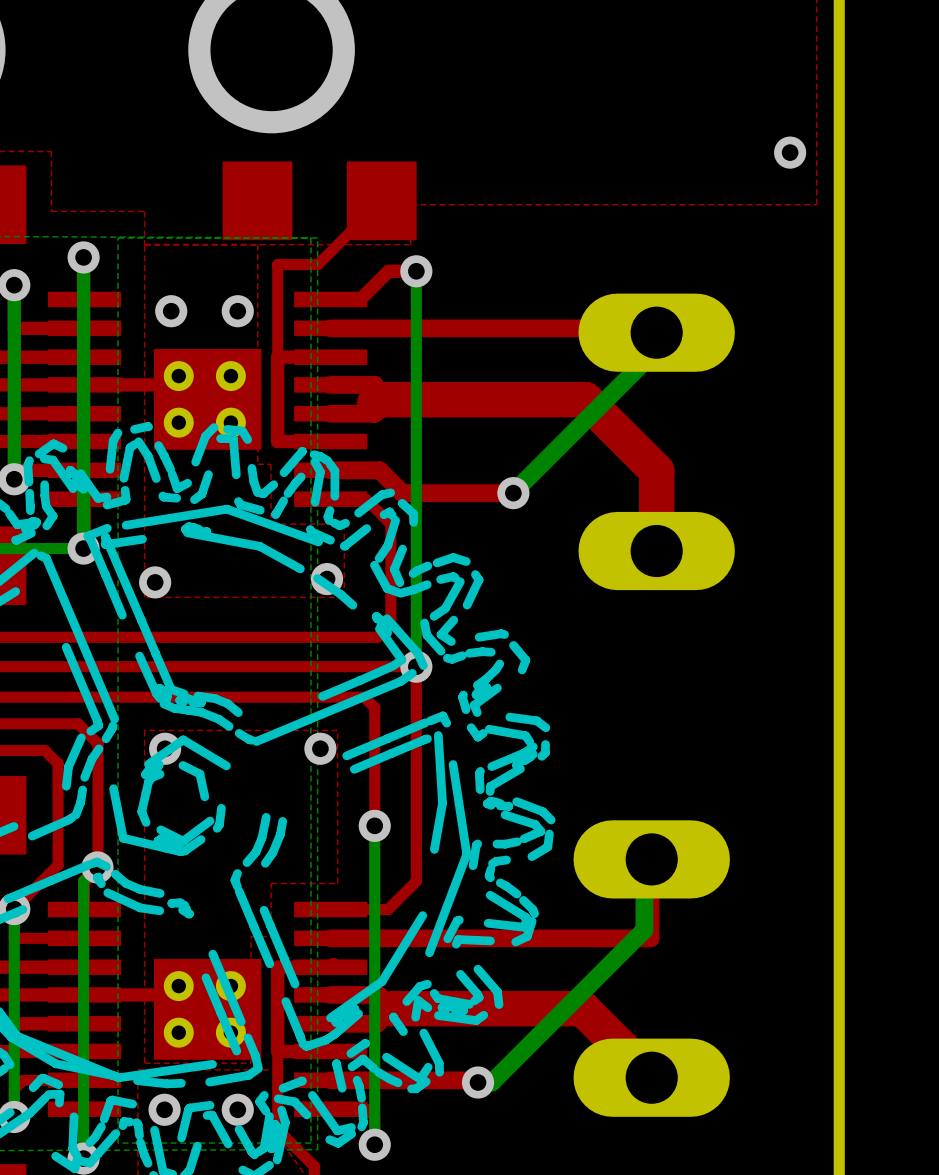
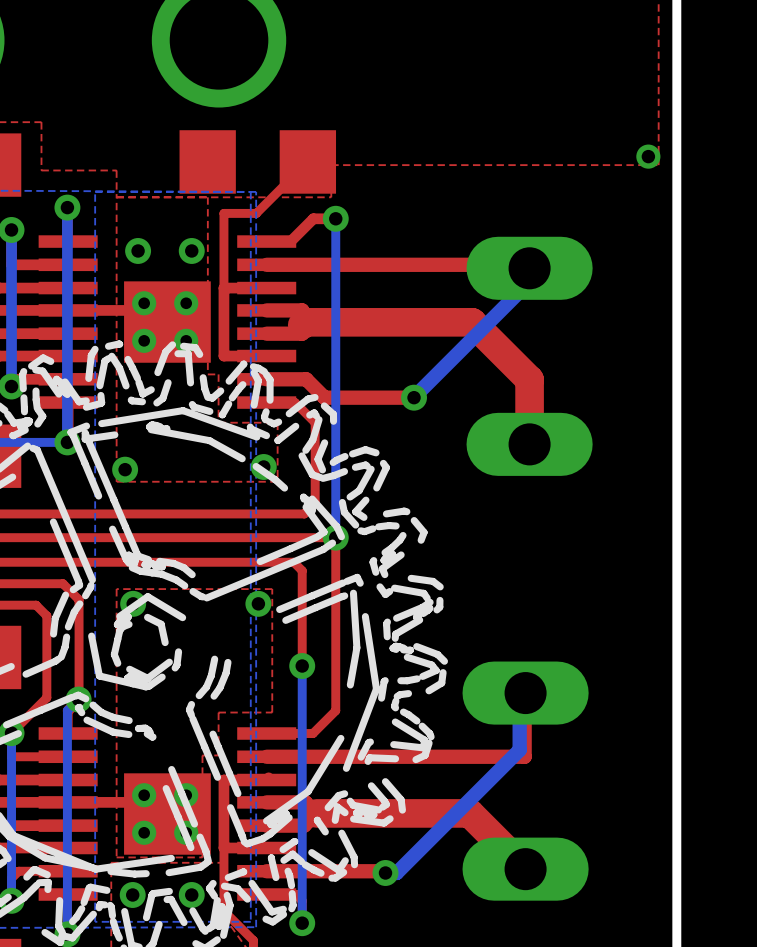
via: (790, 152) -> none
via: none -> (648, 156)

